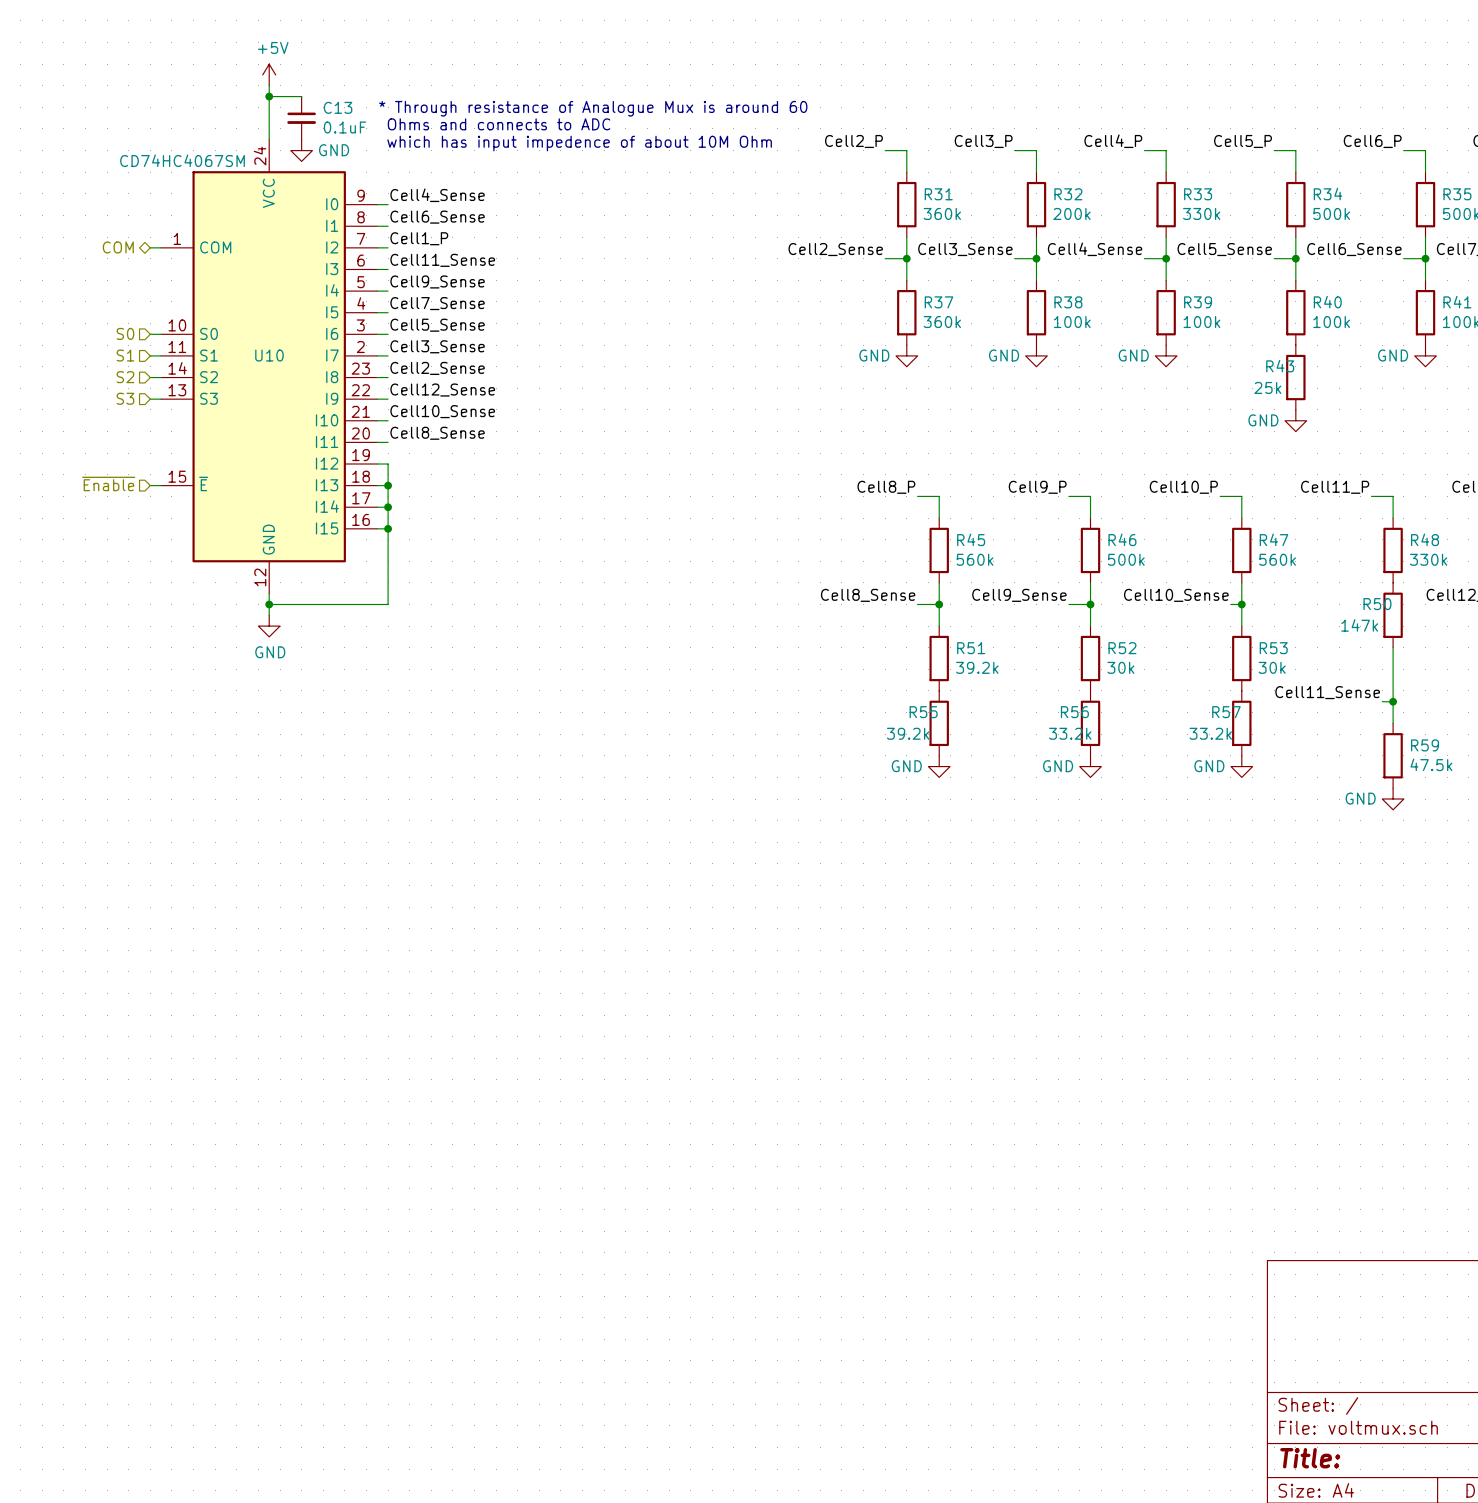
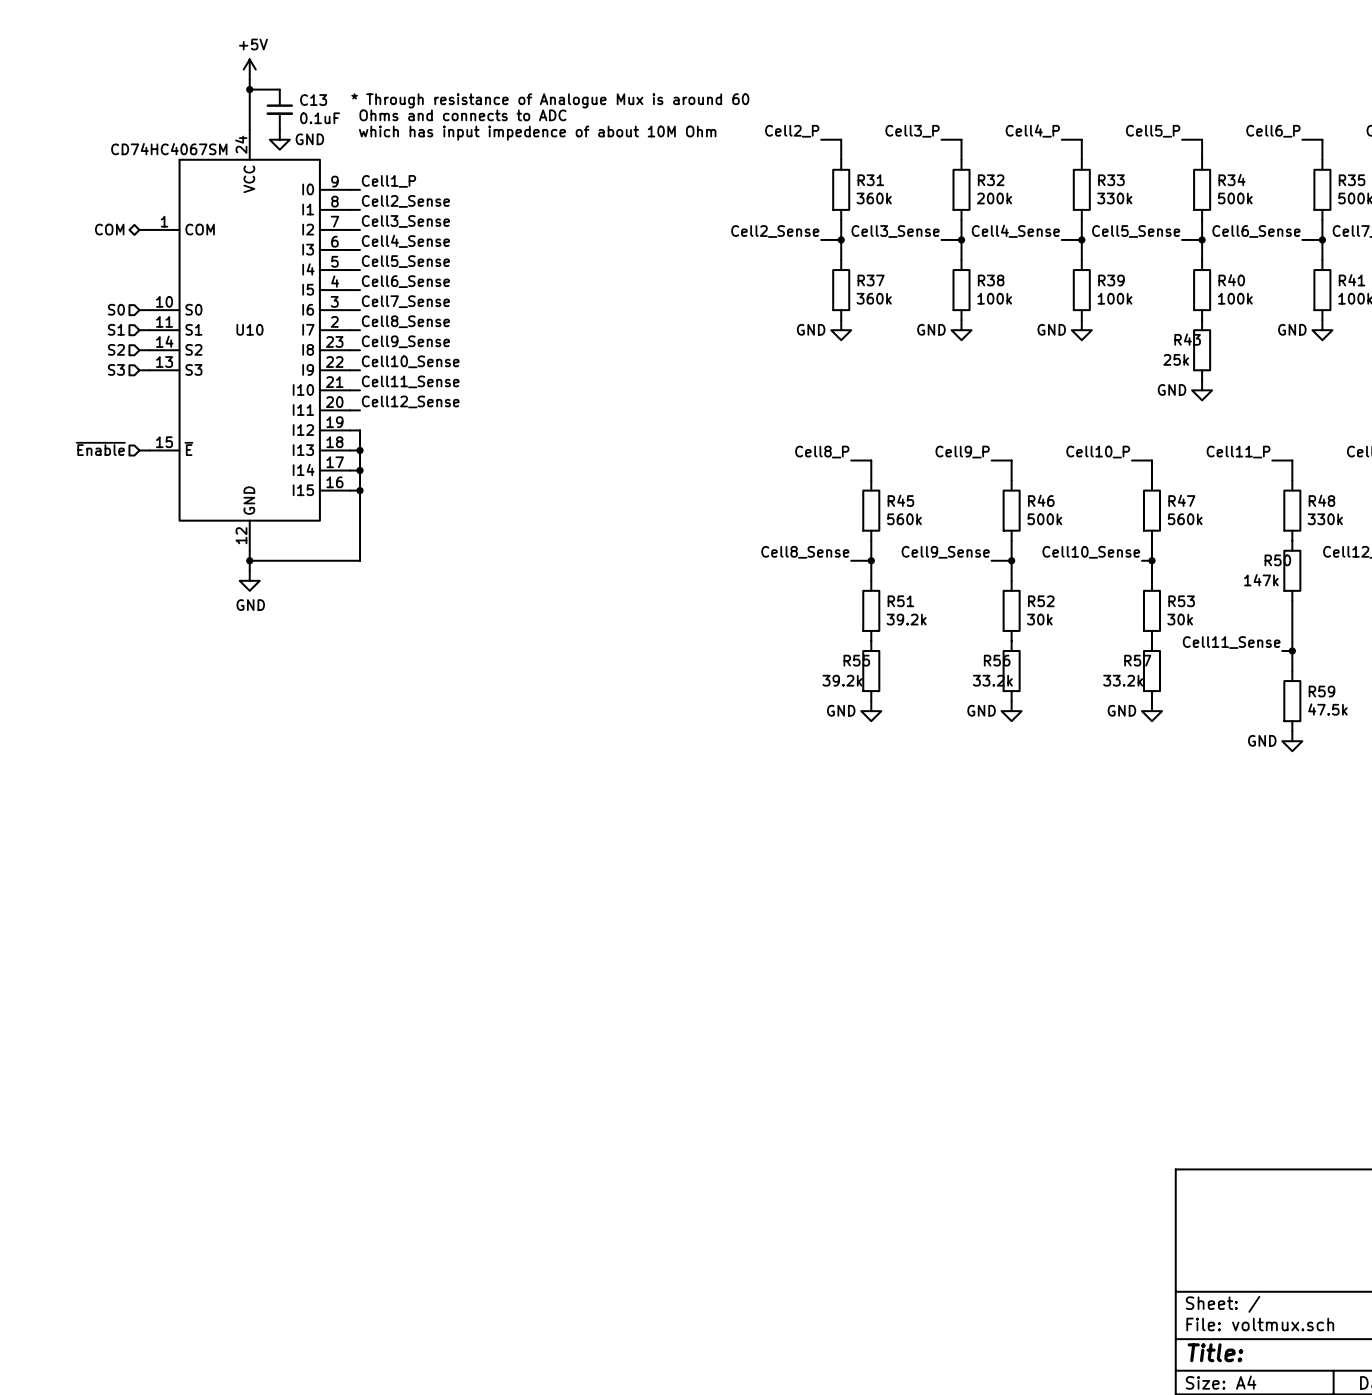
label: Cell4_Sense (437, 195) -> Cell1_P (388, 181)
label: Cell6_Sense (437, 217) -> Cell2_Sense (405, 201)
label: Cell1_P (419, 238) -> Cell3_Sense (405, 221)
label: Cell11_Sense (442, 260) -> Cell4_Sense (405, 241)
label: Cell9_Sense (437, 281) -> Cell5_Sense (405, 261)
label: Cell7_Sense (437, 303) -> Cell6_Sense (405, 281)
label: Cell5_Sense (437, 325) -> Cell7_Sense (405, 301)
label: Cell3_Sense (437, 346) -> Cell8_Sense (405, 321)
label: Cell2_Sense (437, 368) -> Cell9_Sense (405, 341)
label: Cell12_Sense (442, 390) -> Cell10_Sense (410, 361)
label: Cell10_Sense (442, 411) -> Cell11_Sense (410, 381)
label: Cell8_Sense (437, 433) -> Cell12_Sense (410, 401)

